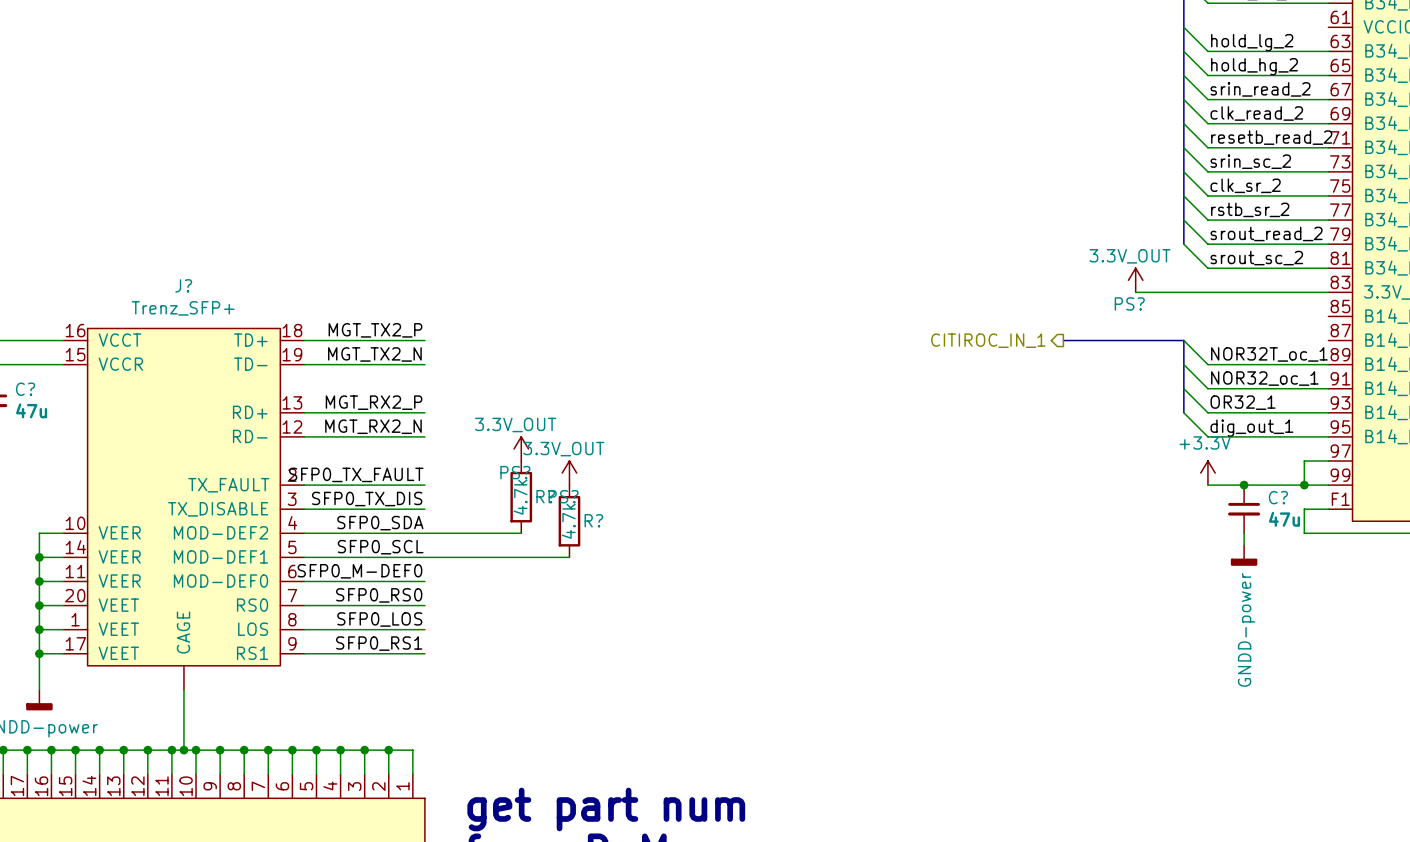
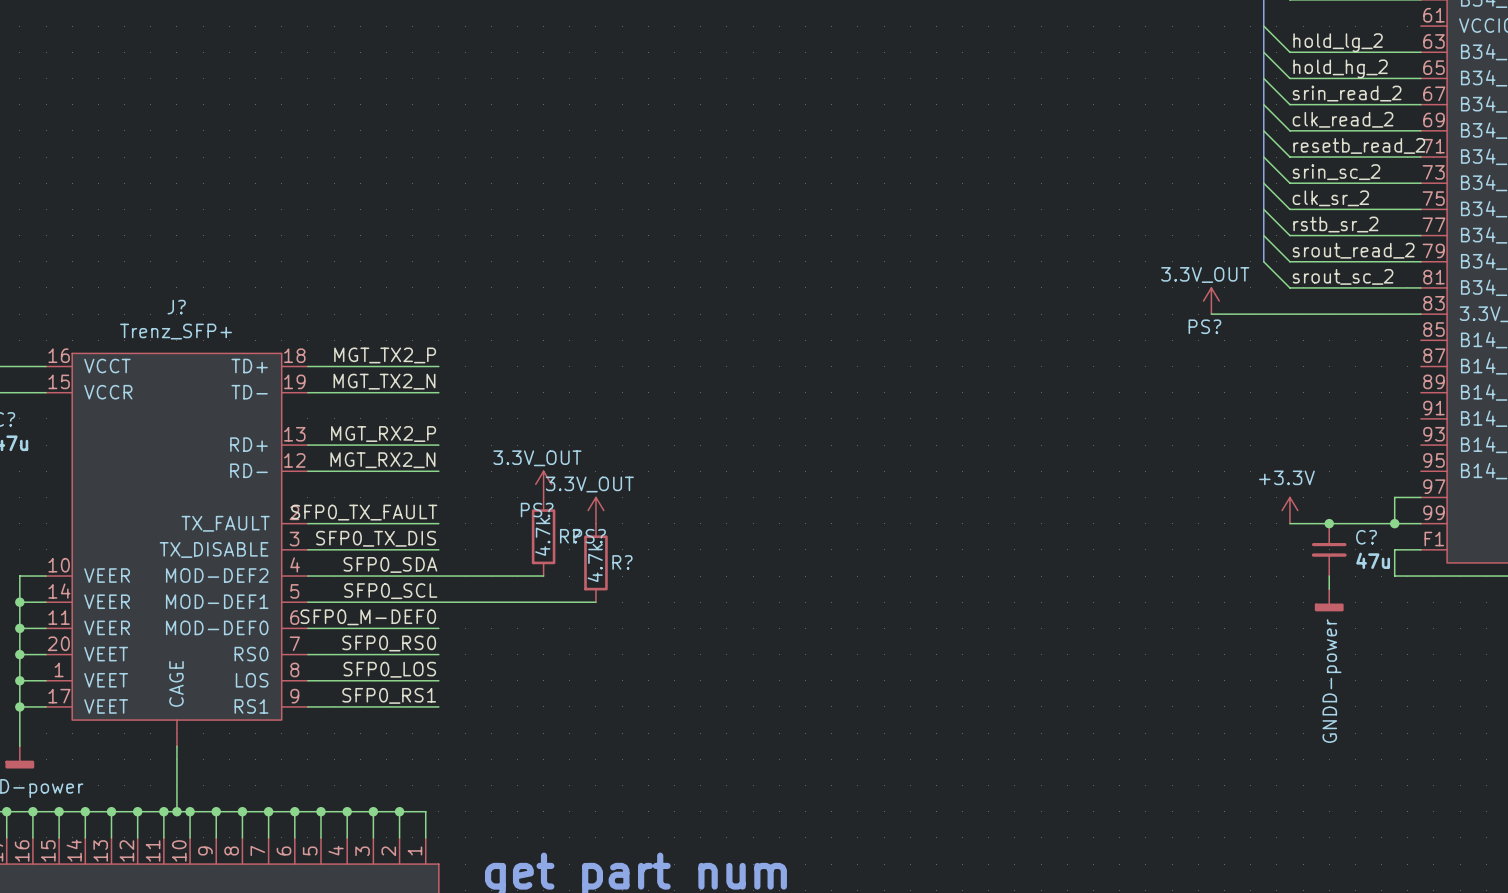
hierarchical label: CITIROC_IN_1 (988, 340) -> none
bus: (1063, 340) (1183, 340) (1183, 412) -> none
wire: (1183, 340) (1207, 364) (1328, 364) -> none
label: NOR32T_oc_1 (1269, 354) -> none
wire: (1183, 364) (1207, 388) (1328, 388) -> none
label: NOR32_oc_1 (1264, 378) -> none
wire: (1183, 388) (1207, 412) (1328, 412) -> none
label: OR32_1 (1243, 402) -> none
wire: (1183, 412) (1207, 436) (1328, 436) -> none
label: dig_out_1 (1251, 428) -> none

